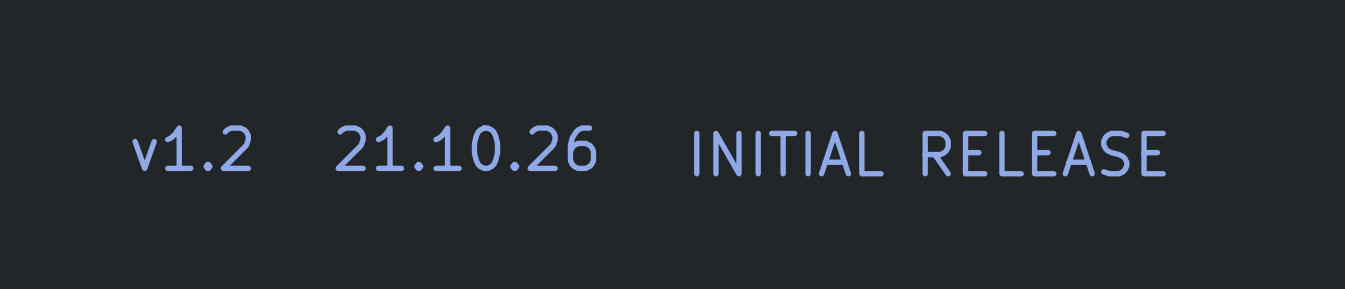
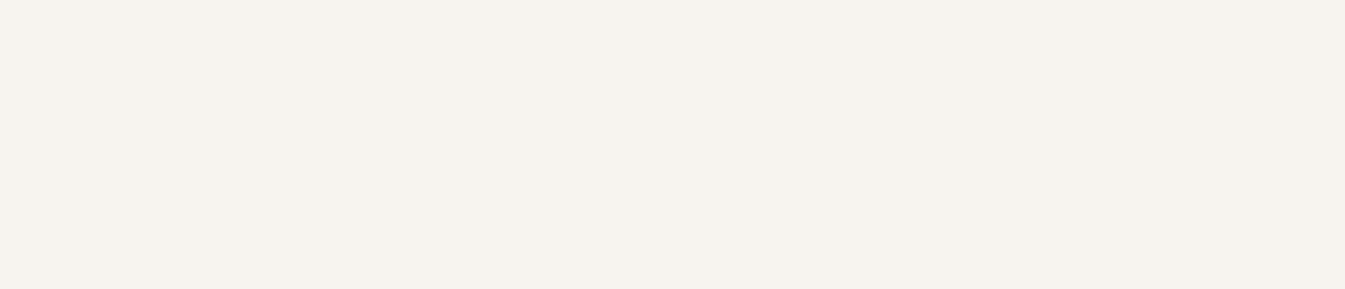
text: v1.2 (191, 148) -> none
text: 21.10.26 (465, 148) -> none
text: INITIAL RELEASE (929, 153) -> none

